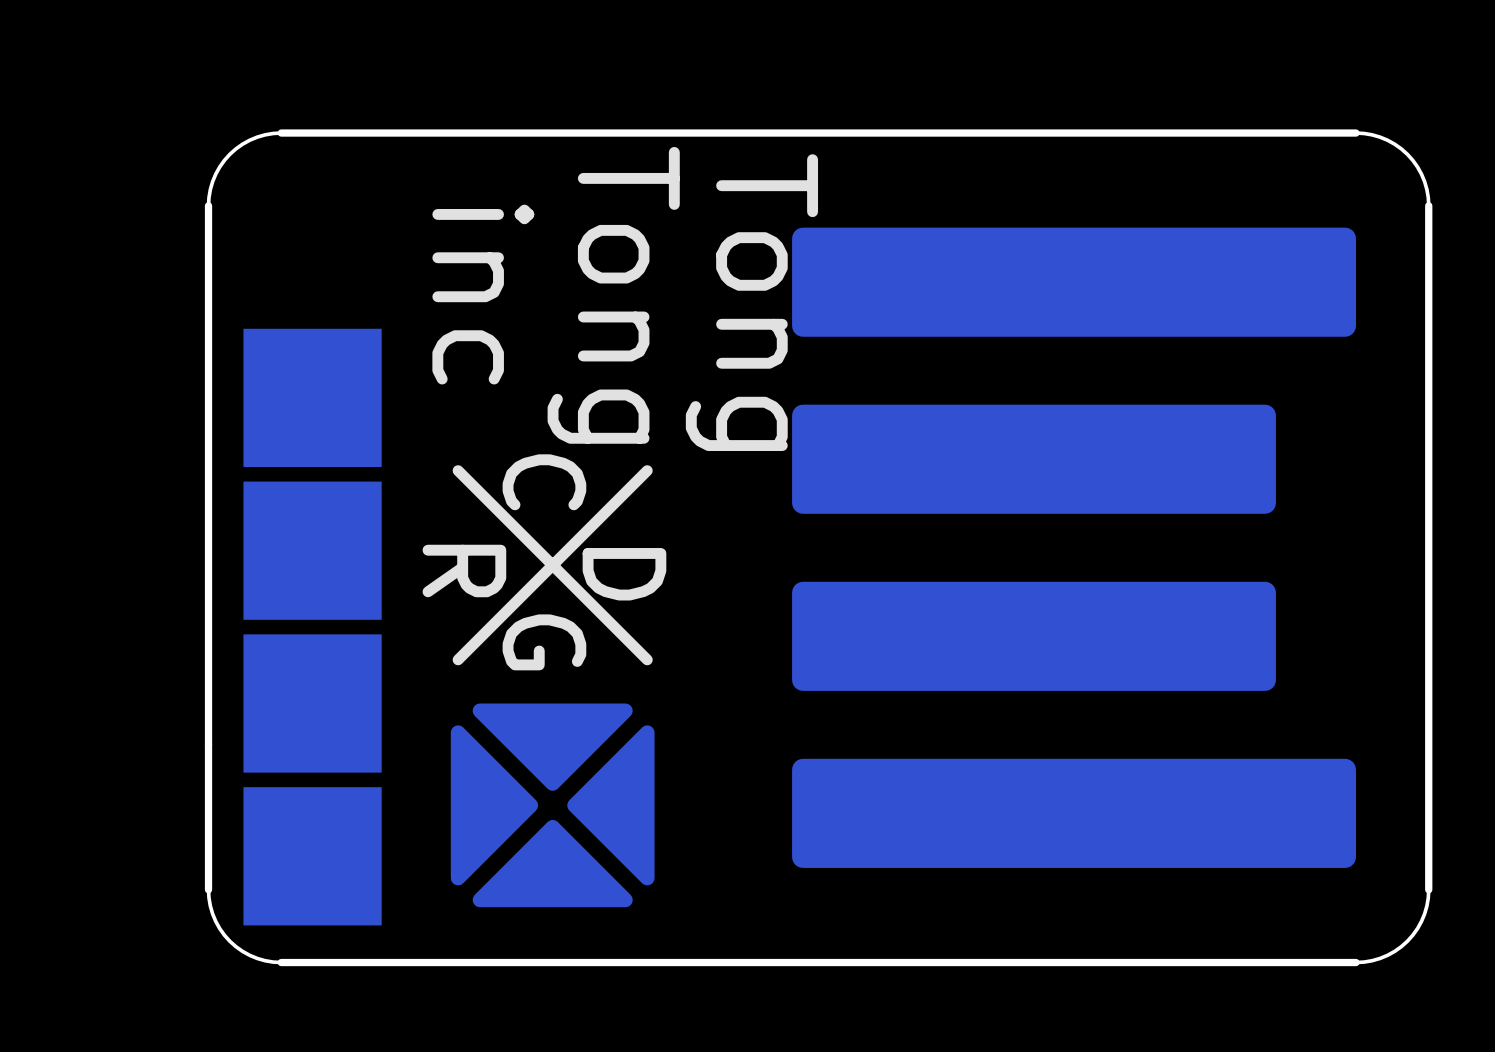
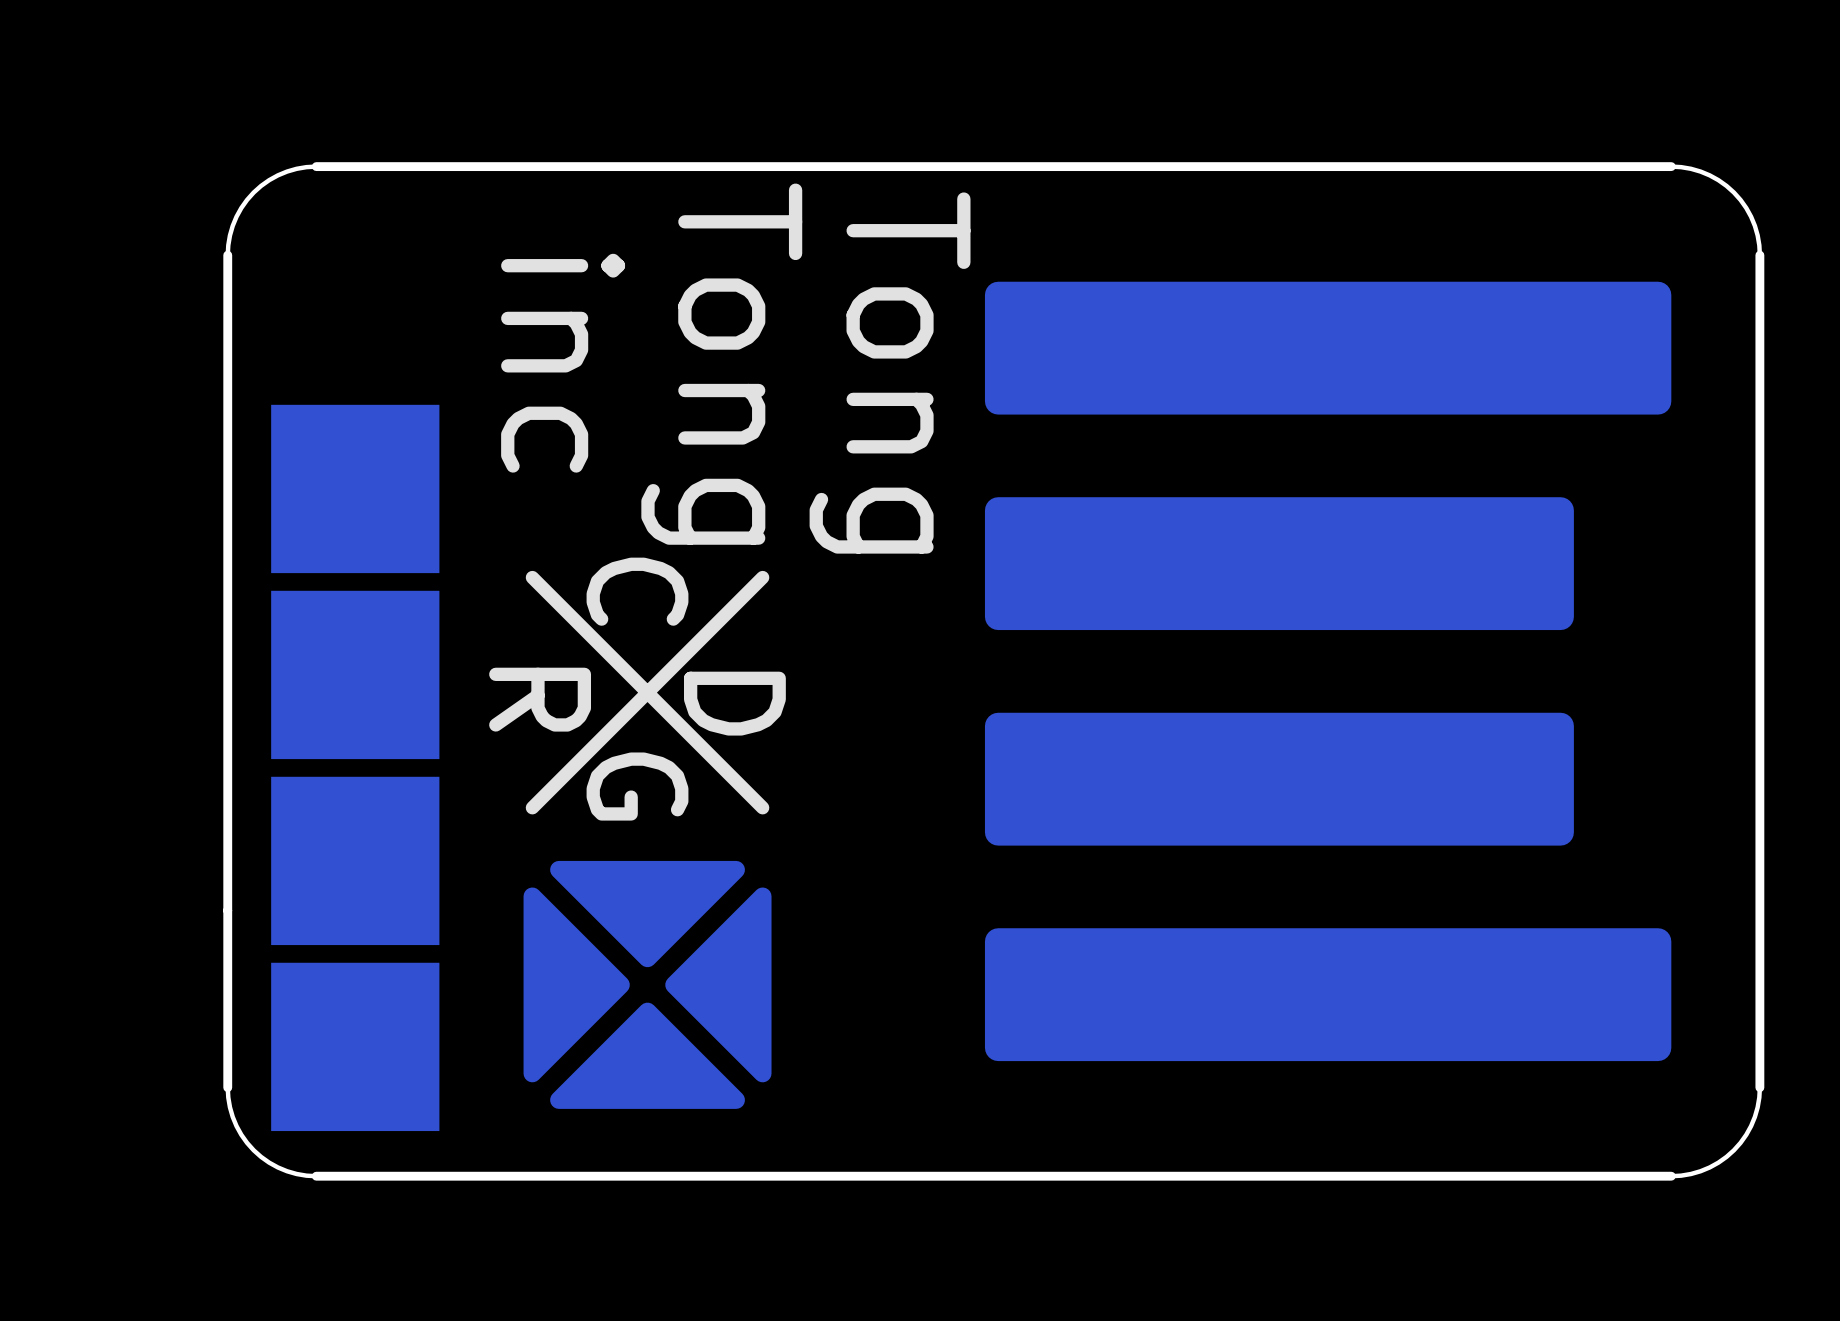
board edge: (281, 133) (257, 137) (242, 144) (229, 154) (215, 174) (210, 189) (208, 205) (208, 897) (215, 921) (224, 935) (235, 946) (257, 958) (281, 962) -> (363, 166) (306, 167) (287, 171) (269, 180) (247, 199) (236, 216) (229, 235) (227, 255) (228, 1097) (232, 1116) (241, 1134) (253, 1150) (269, 1162) (287, 1171) (306, 1175) (363, 1176)
part position: (449, 627) -> (521, 767)

